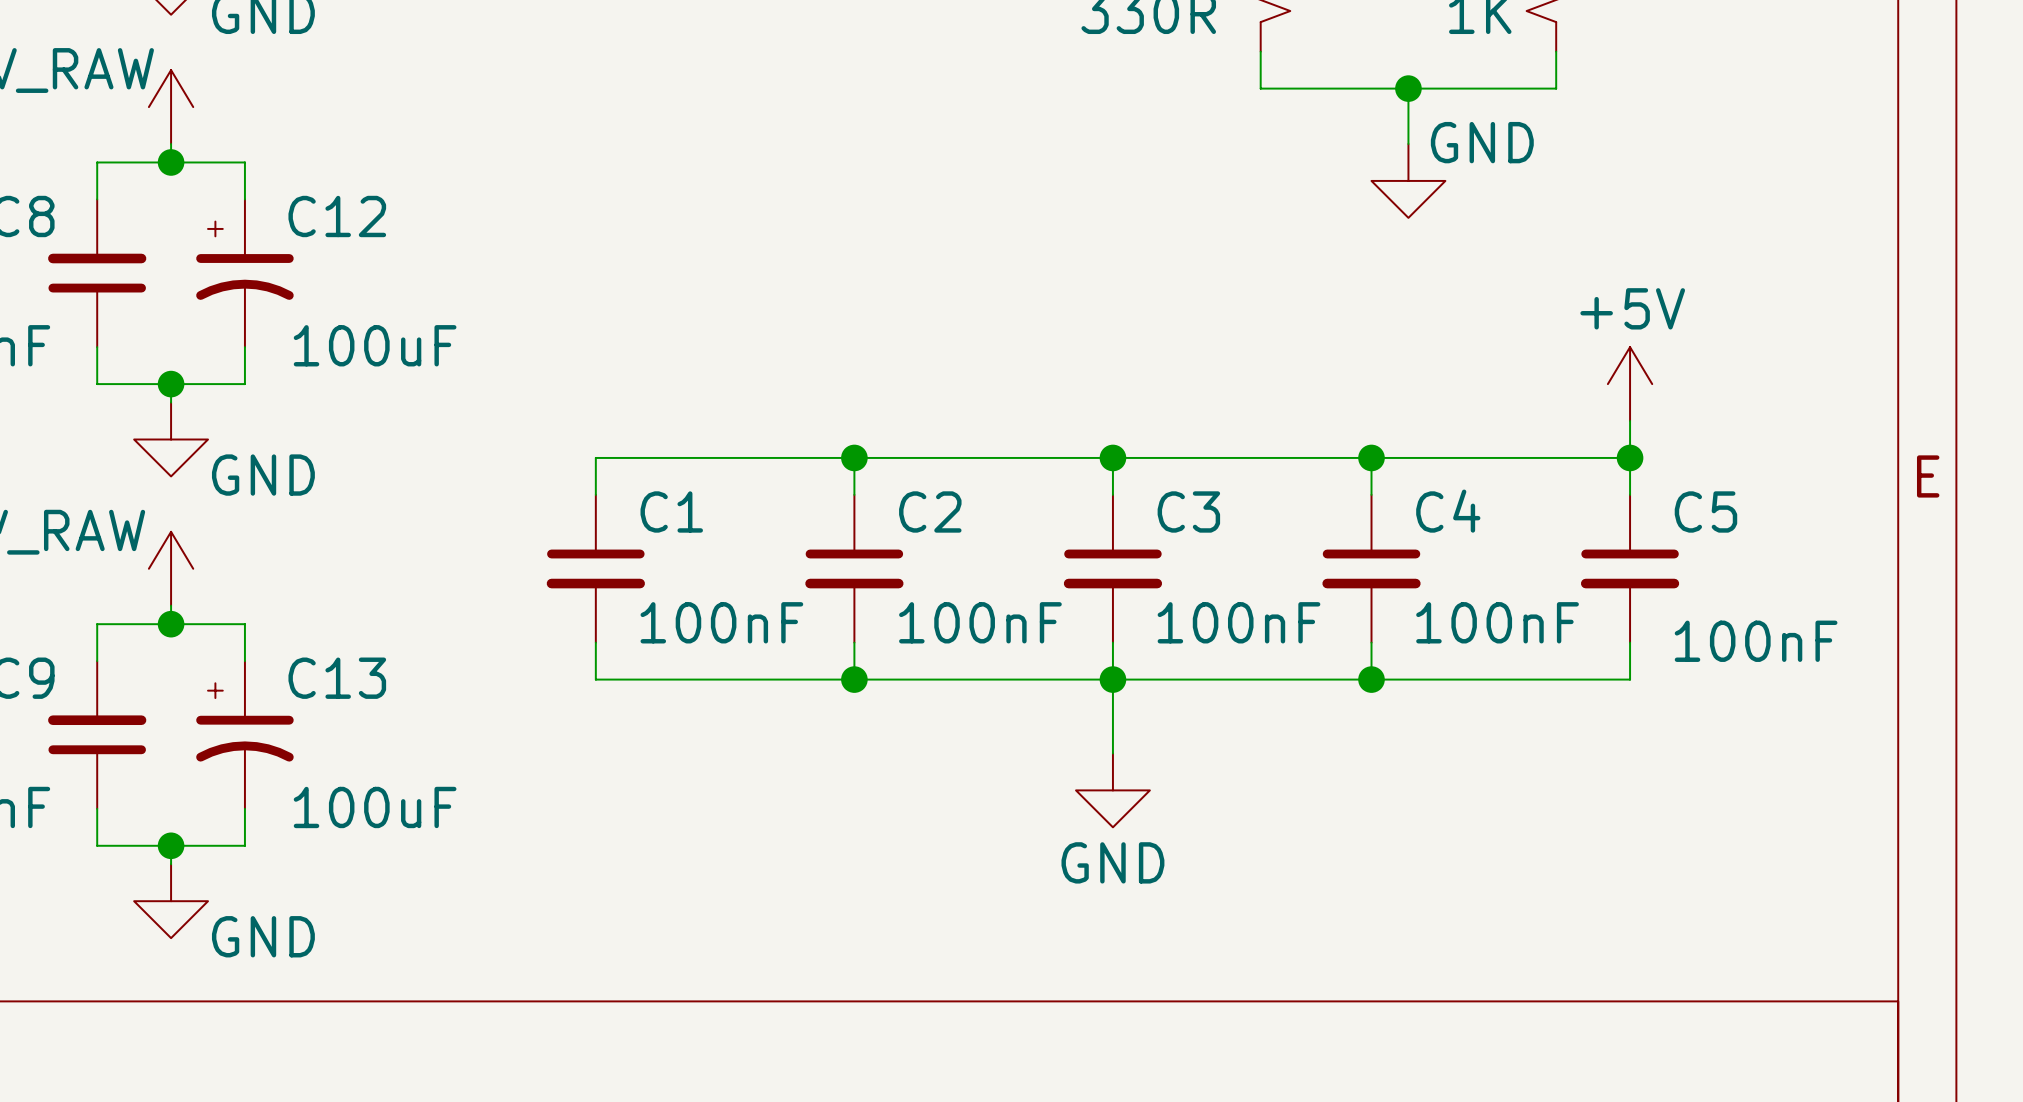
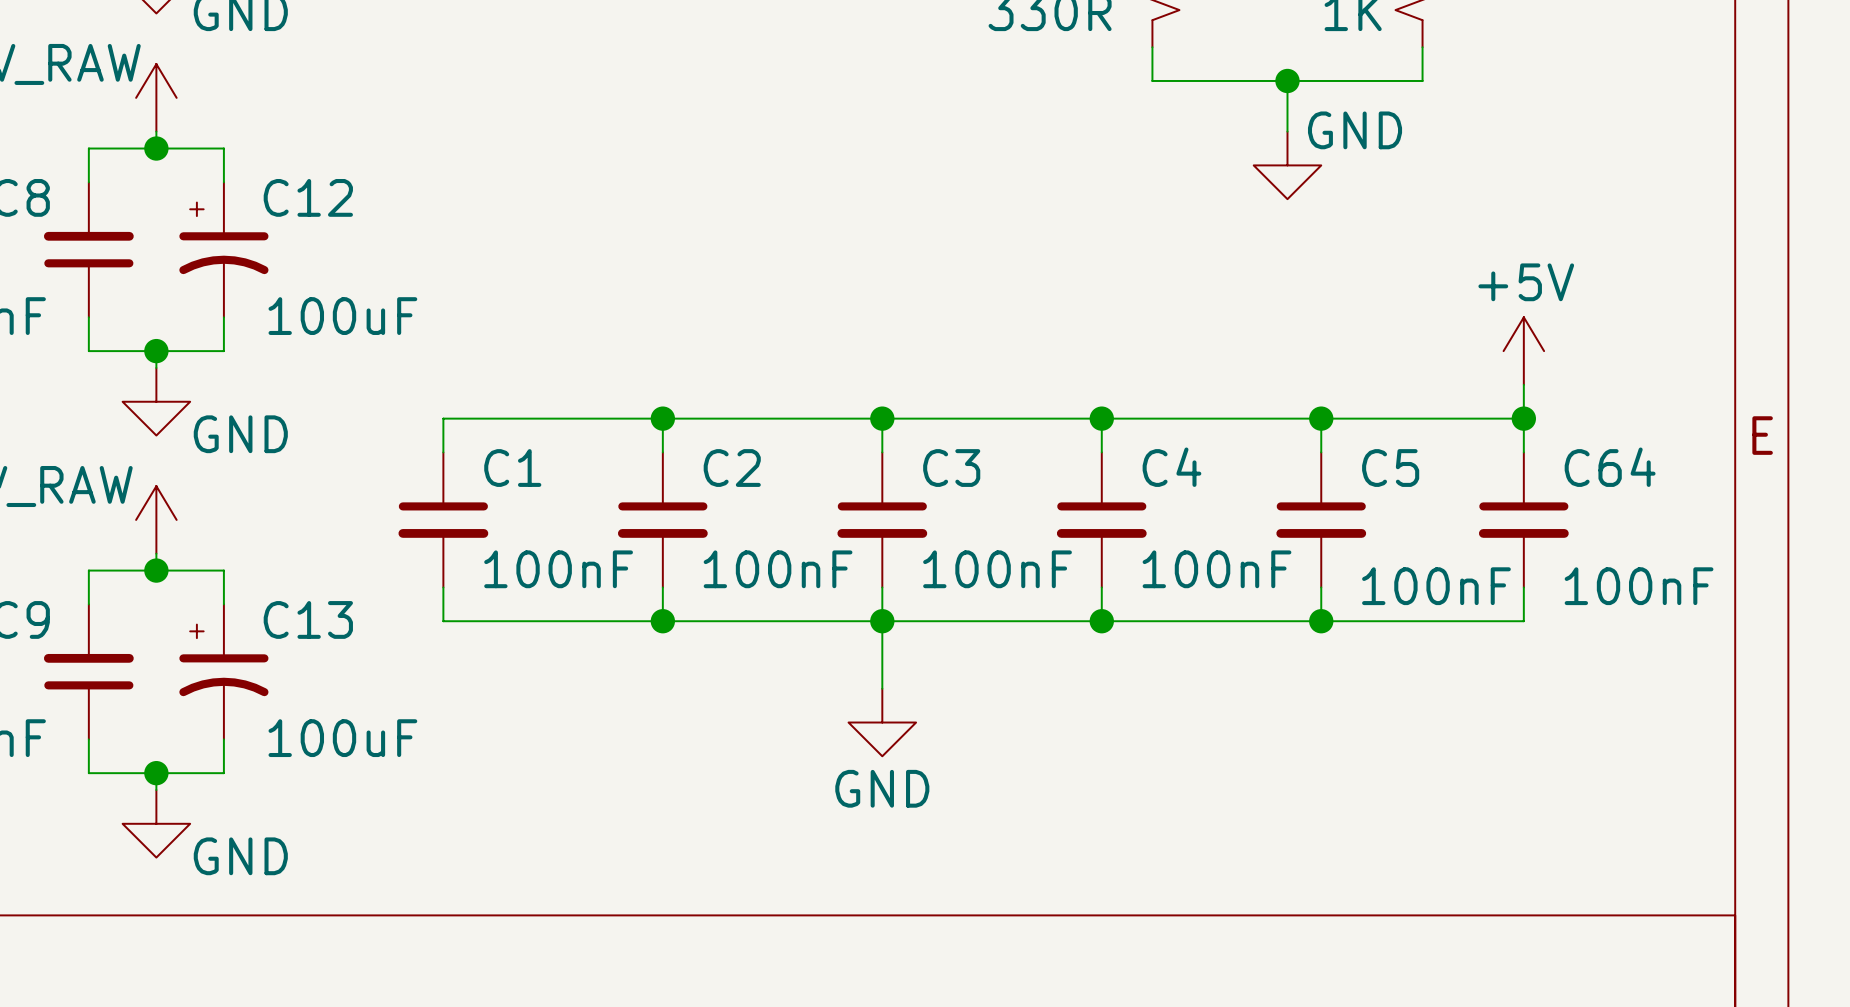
power symbol position: +5V (1630, 384) -> +5V (1523, 351)
wire: (1630, 421) (1630, 494) -> (1523, 384) (1523, 452)
wire: (595, 457) (595, 494) -> (544, 418) (443, 418) (443, 452)
junction: none -> (662, 418)
wire: (854, 457) (854, 494) -> (662, 418) (662, 452)
junction: (854, 457) -> none
junction: none -> (882, 418)
wire: (1112, 457) (1112, 494) -> (882, 418) (882, 452)
junction: (1112, 457) -> none
wire: none -> (1101, 418) (1101, 452)
junction: none -> (1101, 418)
wire: (1371, 457) (1371, 494) -> (1321, 418) (1321, 452)
junction position: (1371, 457) -> (1321, 418)
wire: none -> (1490, 418) (1523, 418)
junction position: (1630, 457) -> (1523, 418)
C1 position: (595, 568) -> (443, 519)
C2 position: (854, 568) -> (662, 519)
C3 position: (1112, 568) -> (882, 519)
C4 position: (1371, 568) -> (1101, 519)
C5 position: (1630, 568) -> (1321, 519)
C64: none -> 100nF (1523, 519)
wire: (595, 642) (595, 679) -> (443, 587) (443, 621) (544, 621)
wire: (854, 642) (854, 679) -> (662, 587) (662, 621)
wire: (1112, 642) (1112, 753) -> (882, 587) (882, 688)
wire: none -> (1101, 587) (1101, 621)
wire: (1371, 642) (1371, 679) -> (1321, 587) (1321, 621)
wire: (1630, 642) (1630, 679) -> (1523, 587) (1523, 621) (1490, 621)
junction: none -> (662, 621)
junction: (854, 679) -> none
junction: none -> (882, 621)
junction: (1112, 679) -> none
junction: none -> (1101, 621)
junction position: (1371, 679) -> (1321, 621)
power symbol position: GND (1112, 790) -> GND (882, 722)

